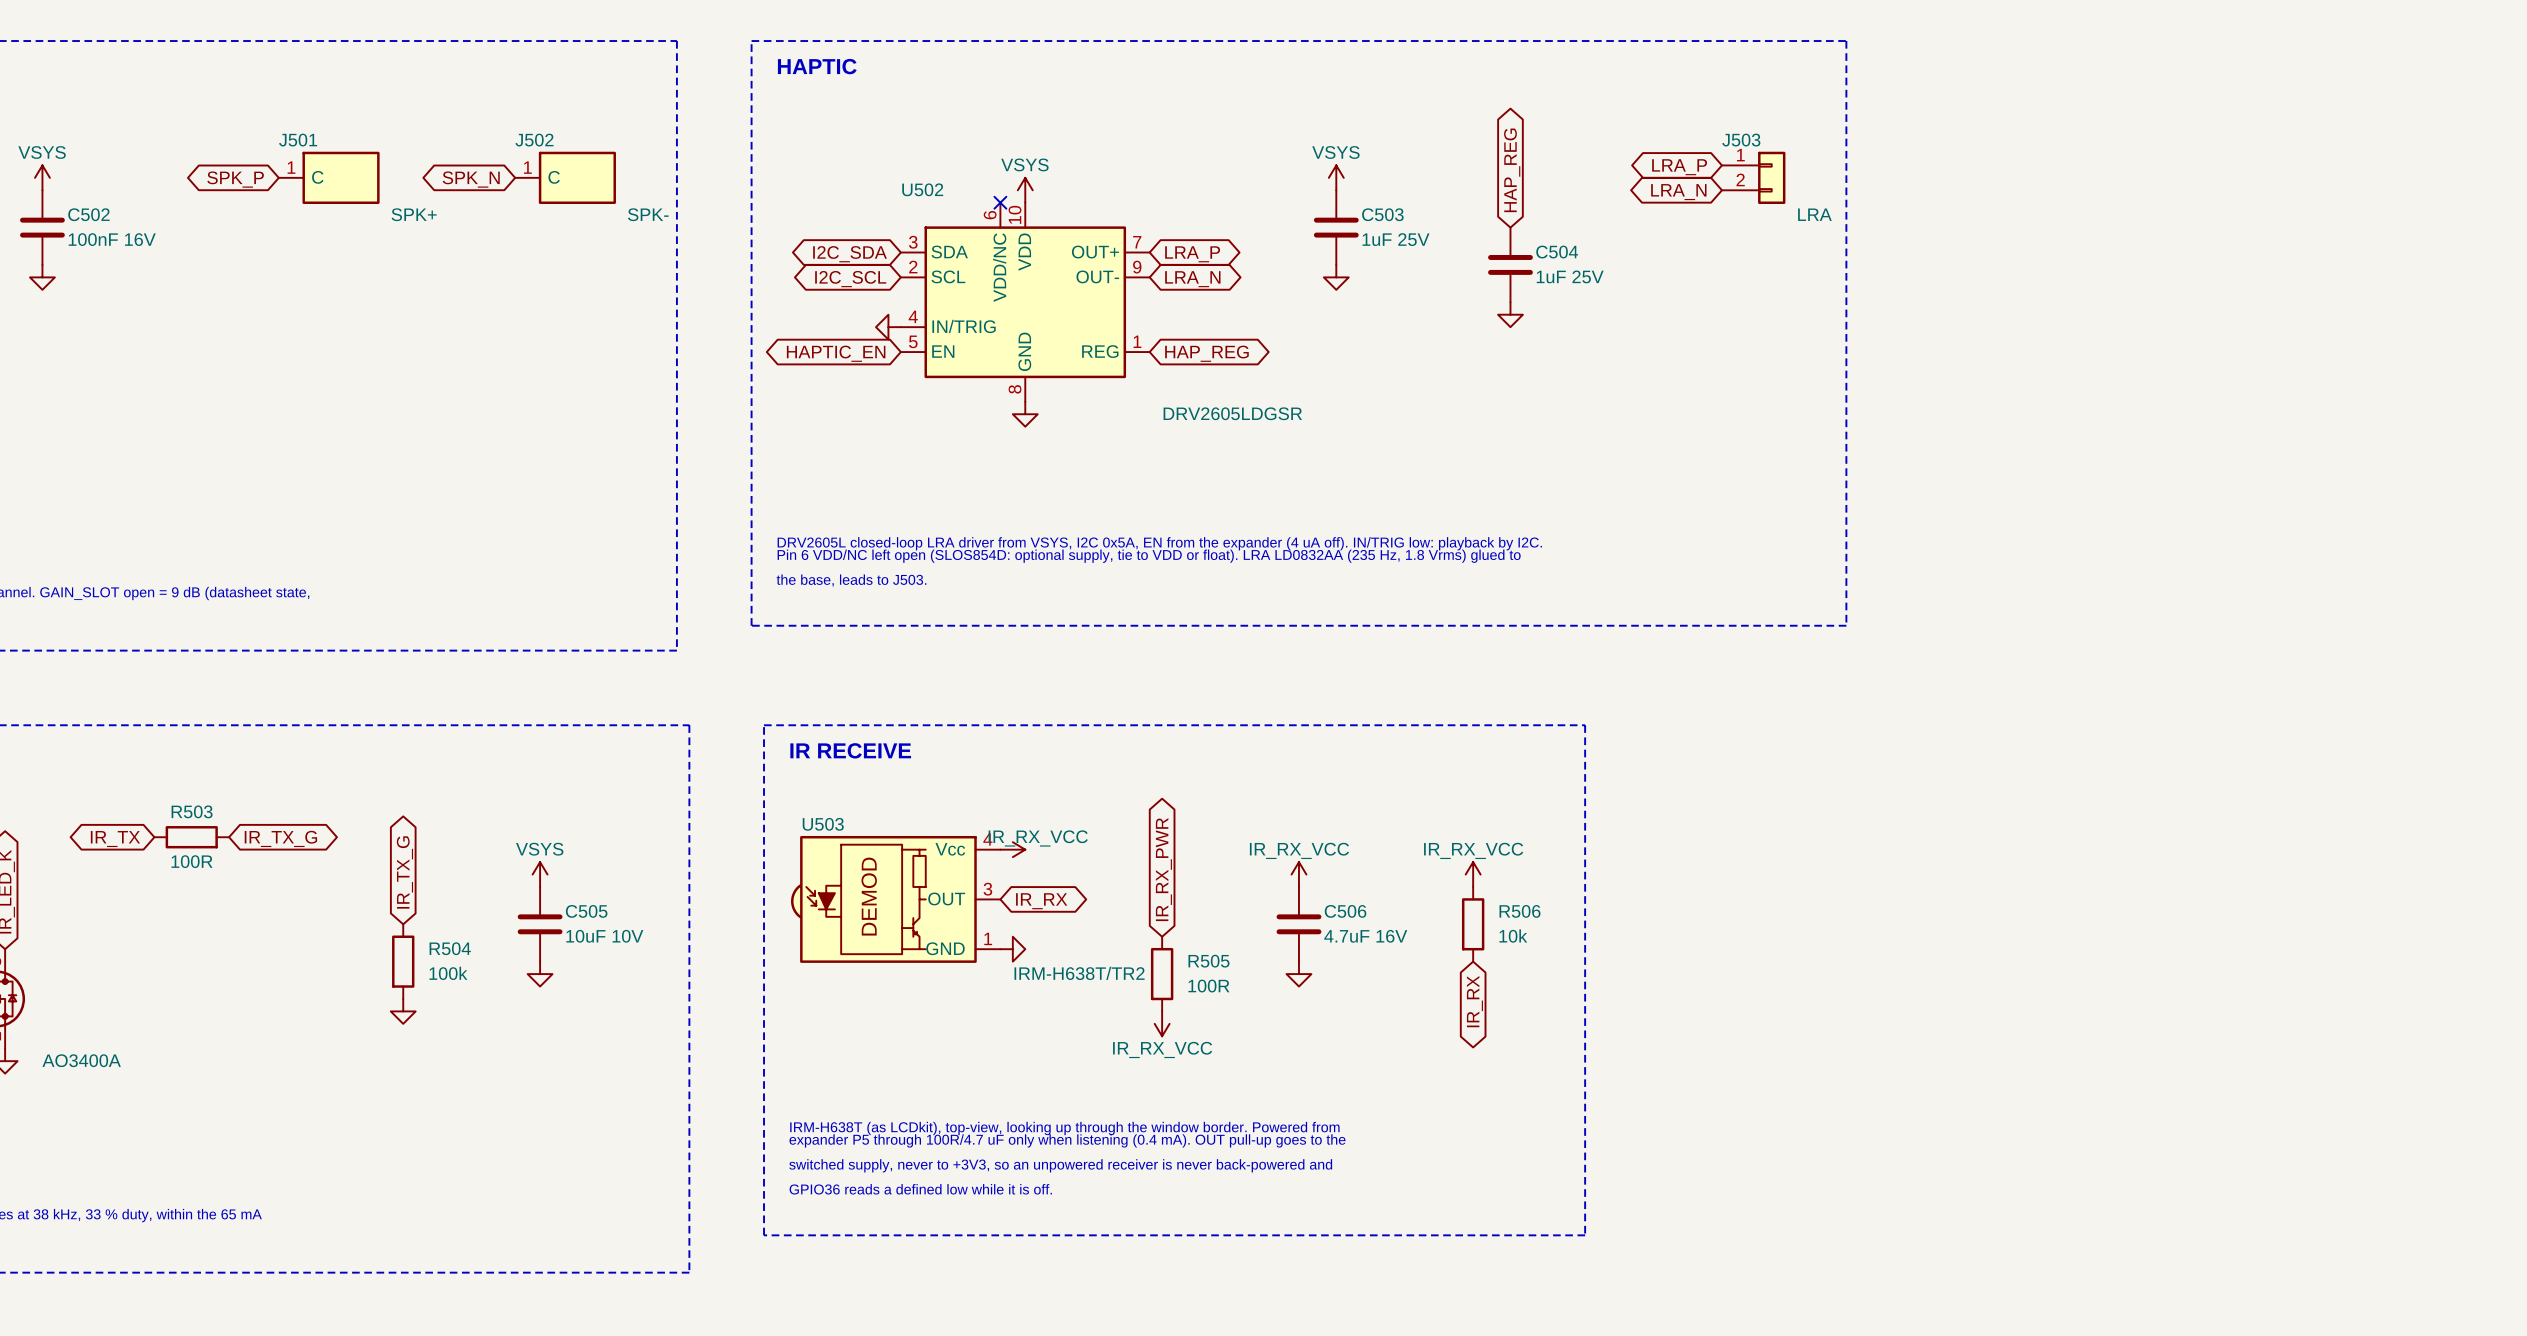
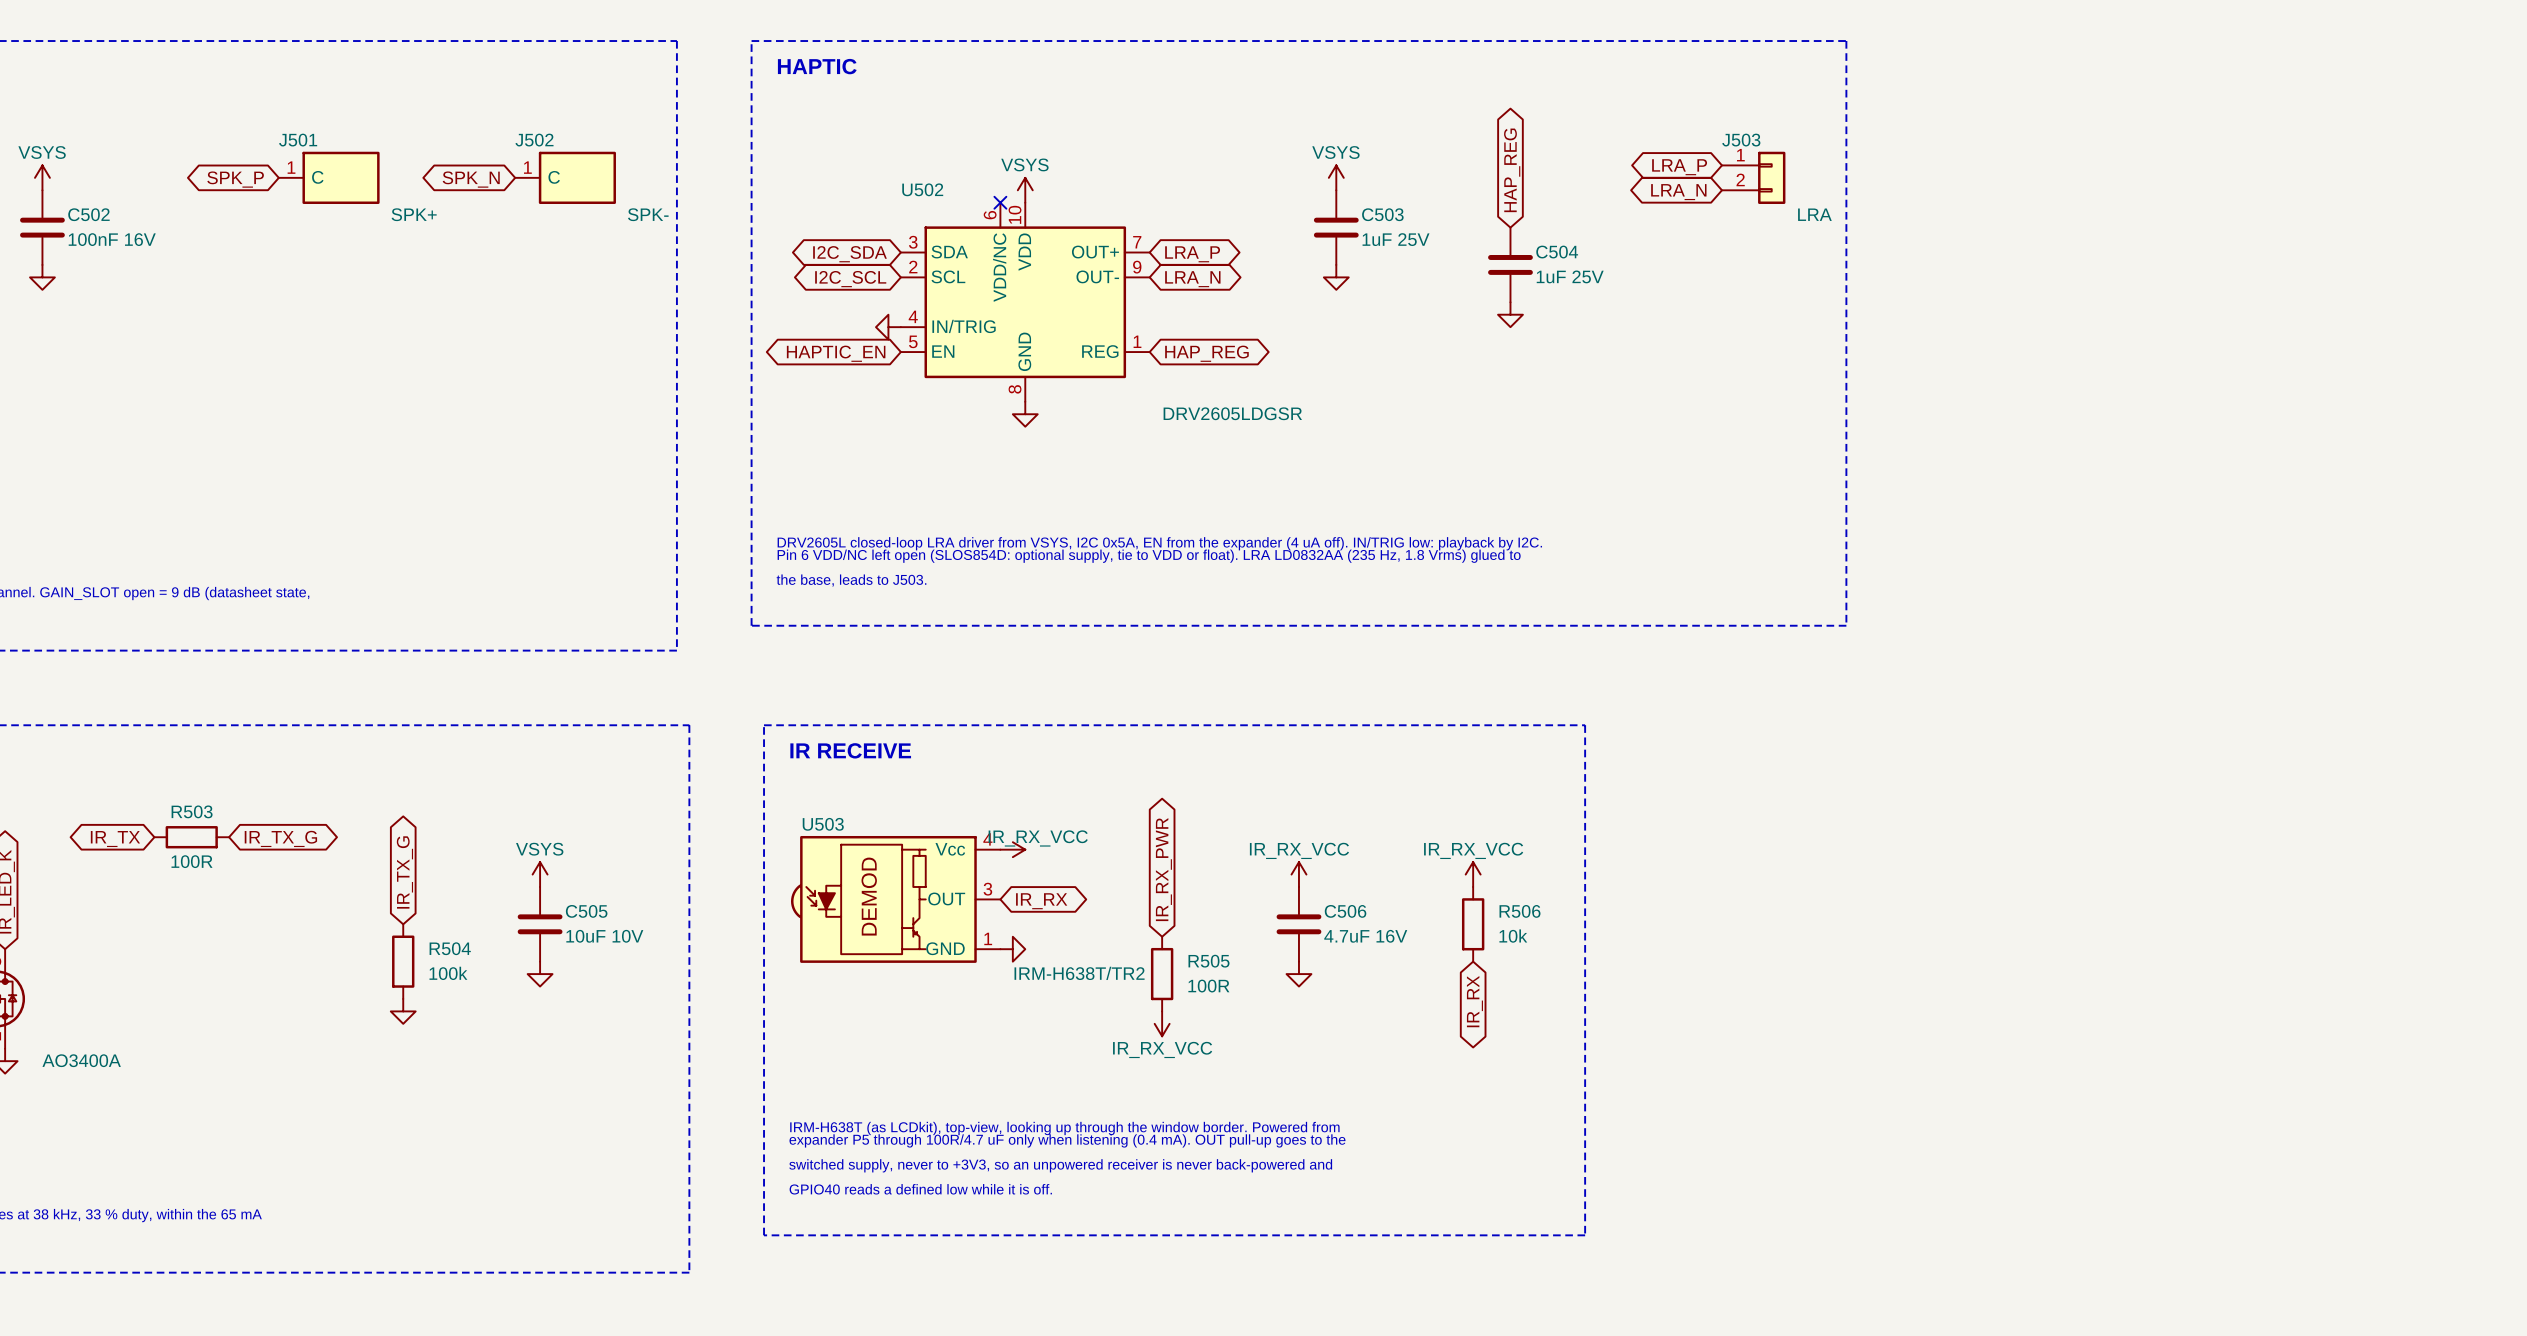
text: GPIO36 reads a defined low while it is off. (920, 1189) -> GPIO40 reads a defined low while it is off. (920, 1189)

